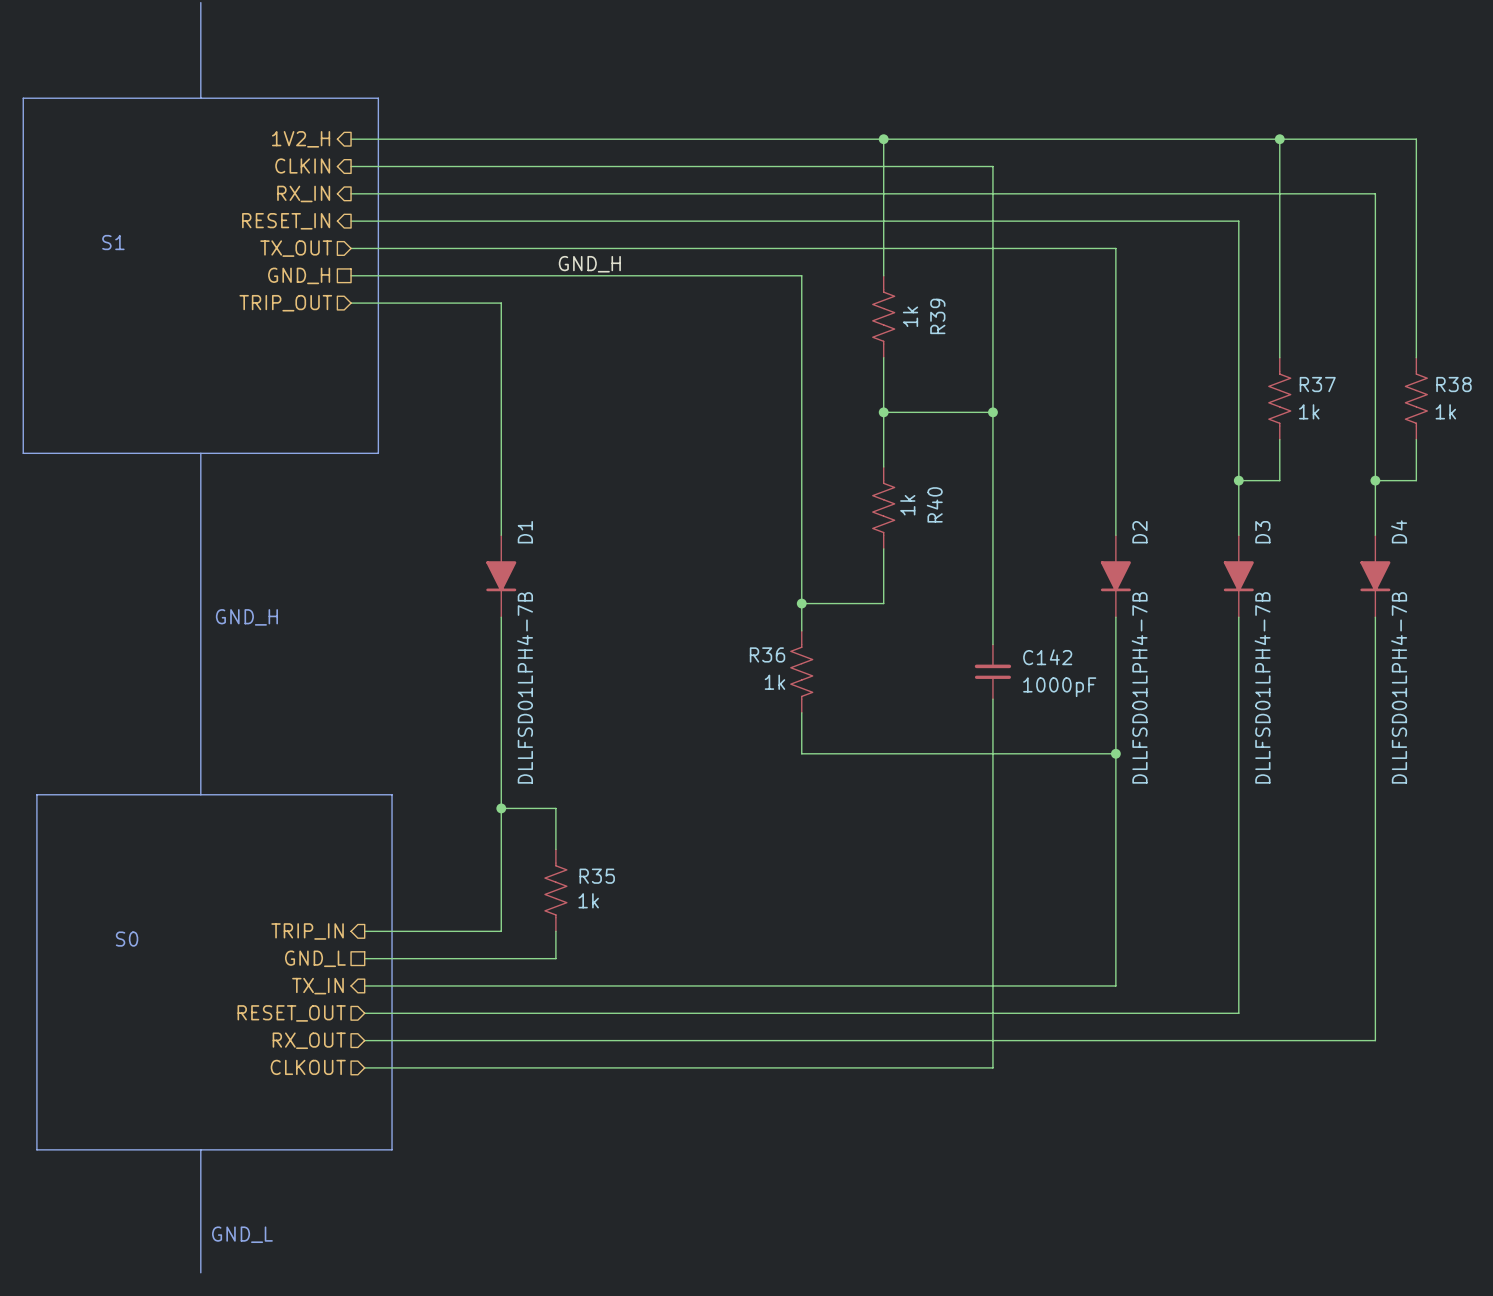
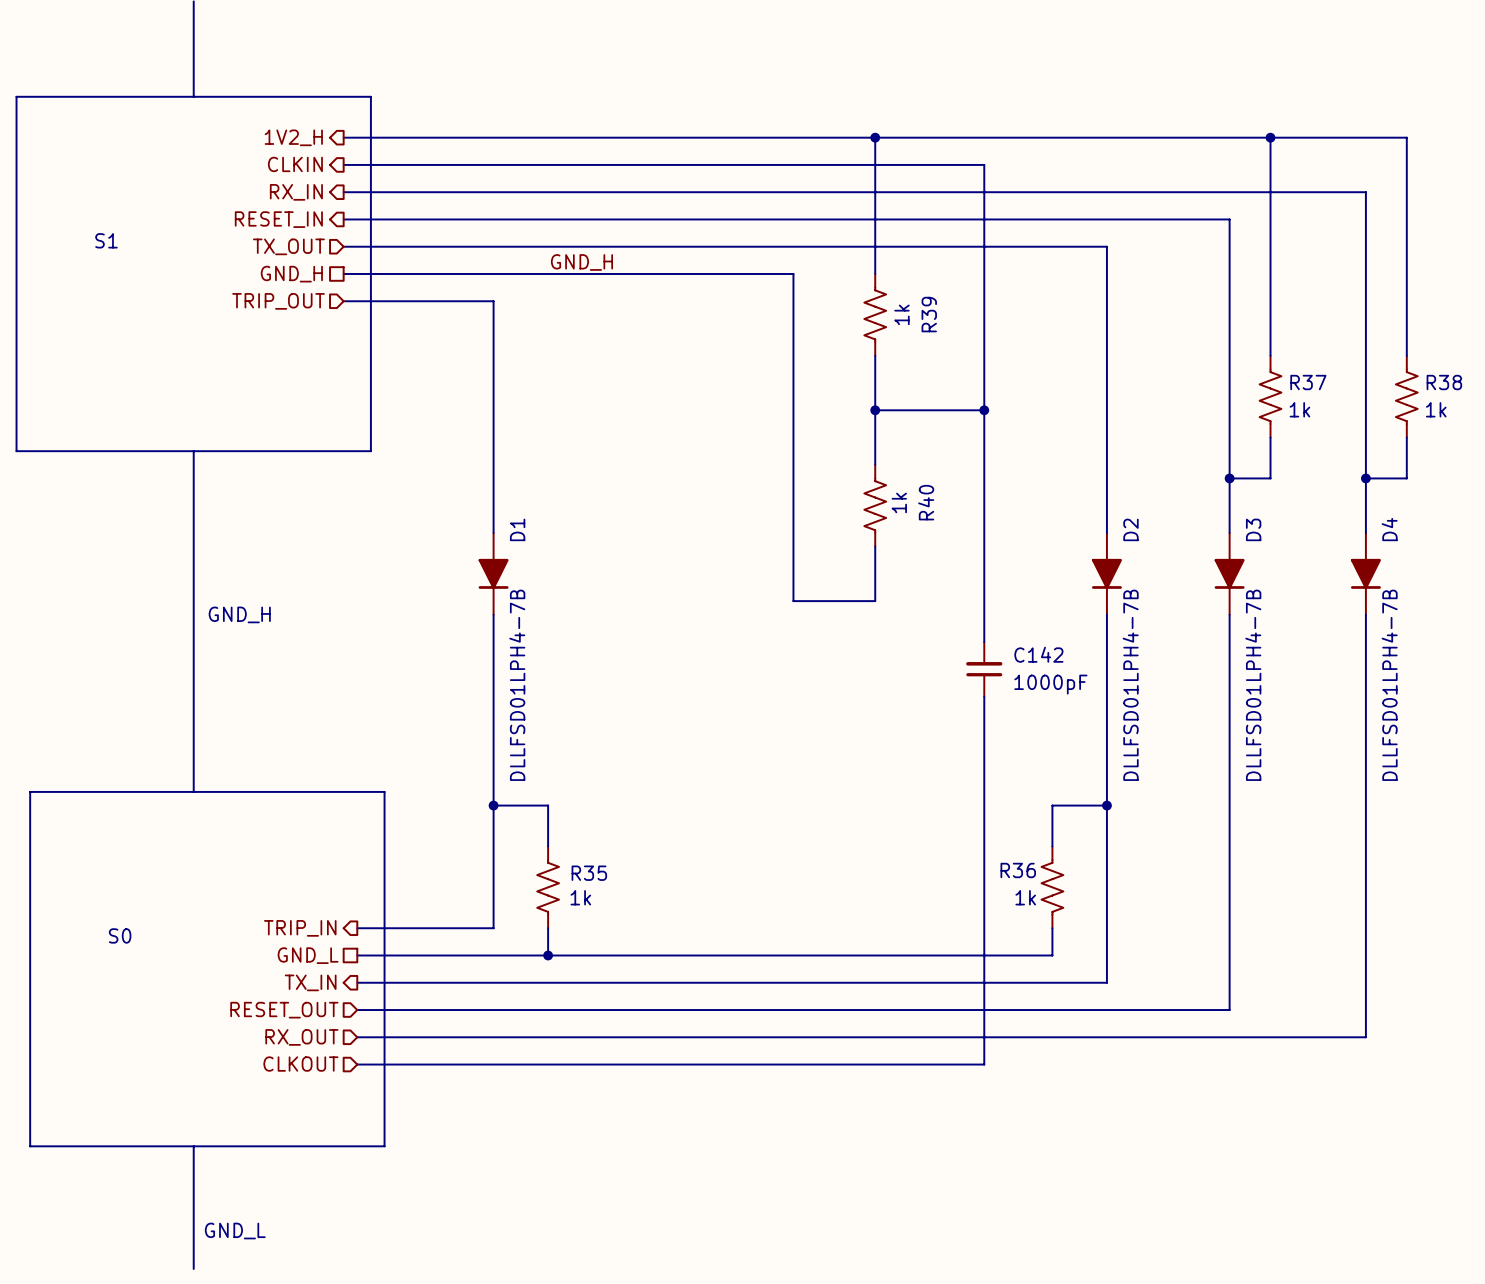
wire: (801, 603) (801, 630) -> none
junction: (801, 603) -> none
R36 position: (801, 671) -> (1052, 887)
wire: (801, 712) (801, 753) (1115, 753) -> none
junction position: (1115, 753) -> (1106, 805)
wire: none -> (1106, 805) (1052, 805) (1052, 846)
wire: none -> (1052, 928) (1052, 955) (548, 955)
junction: none -> (548, 955)

